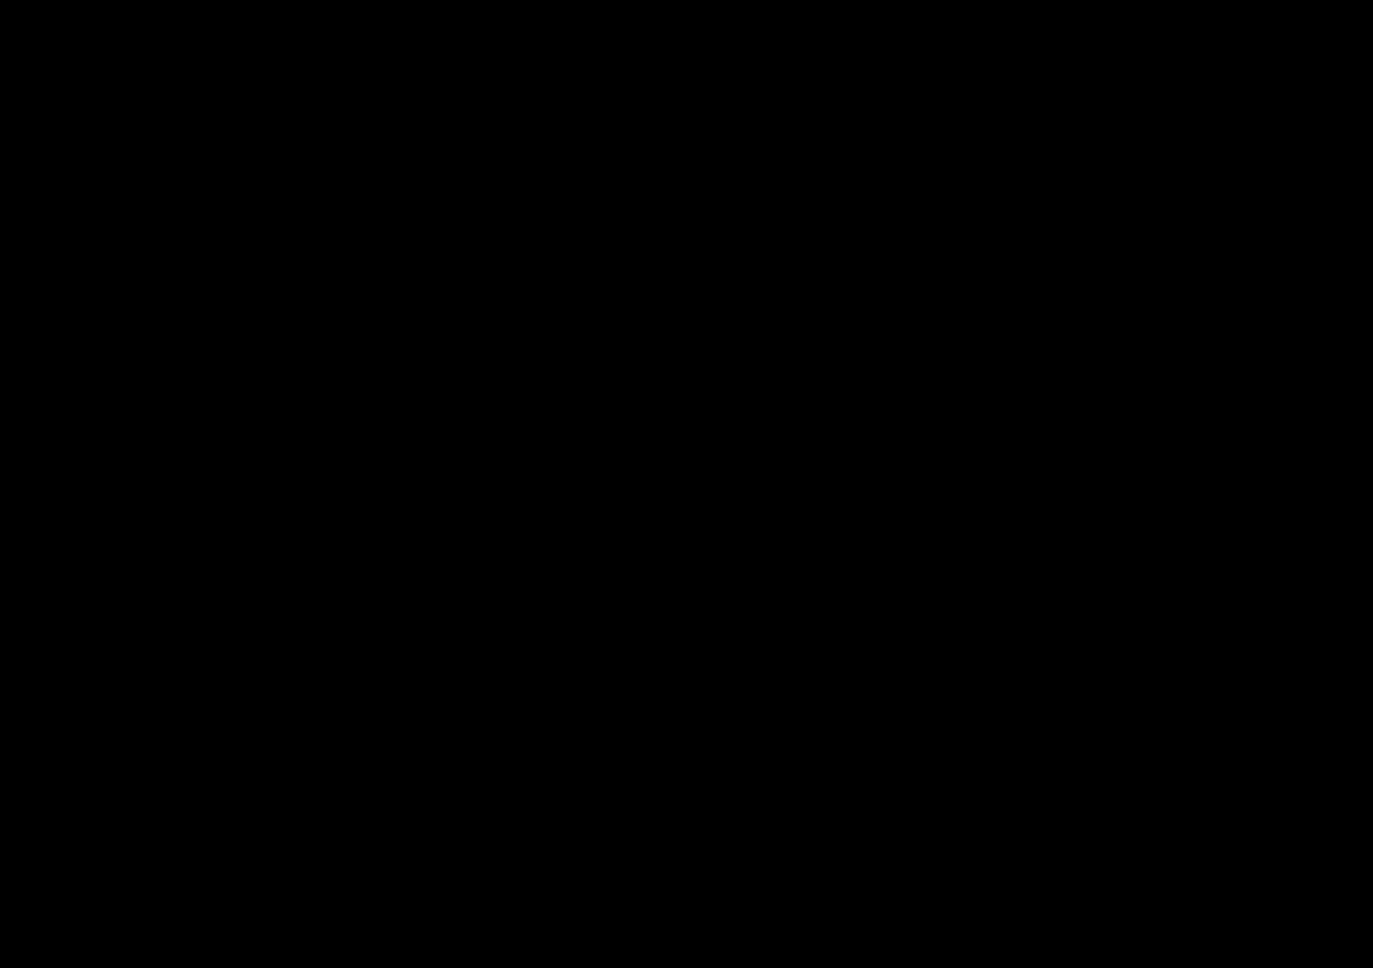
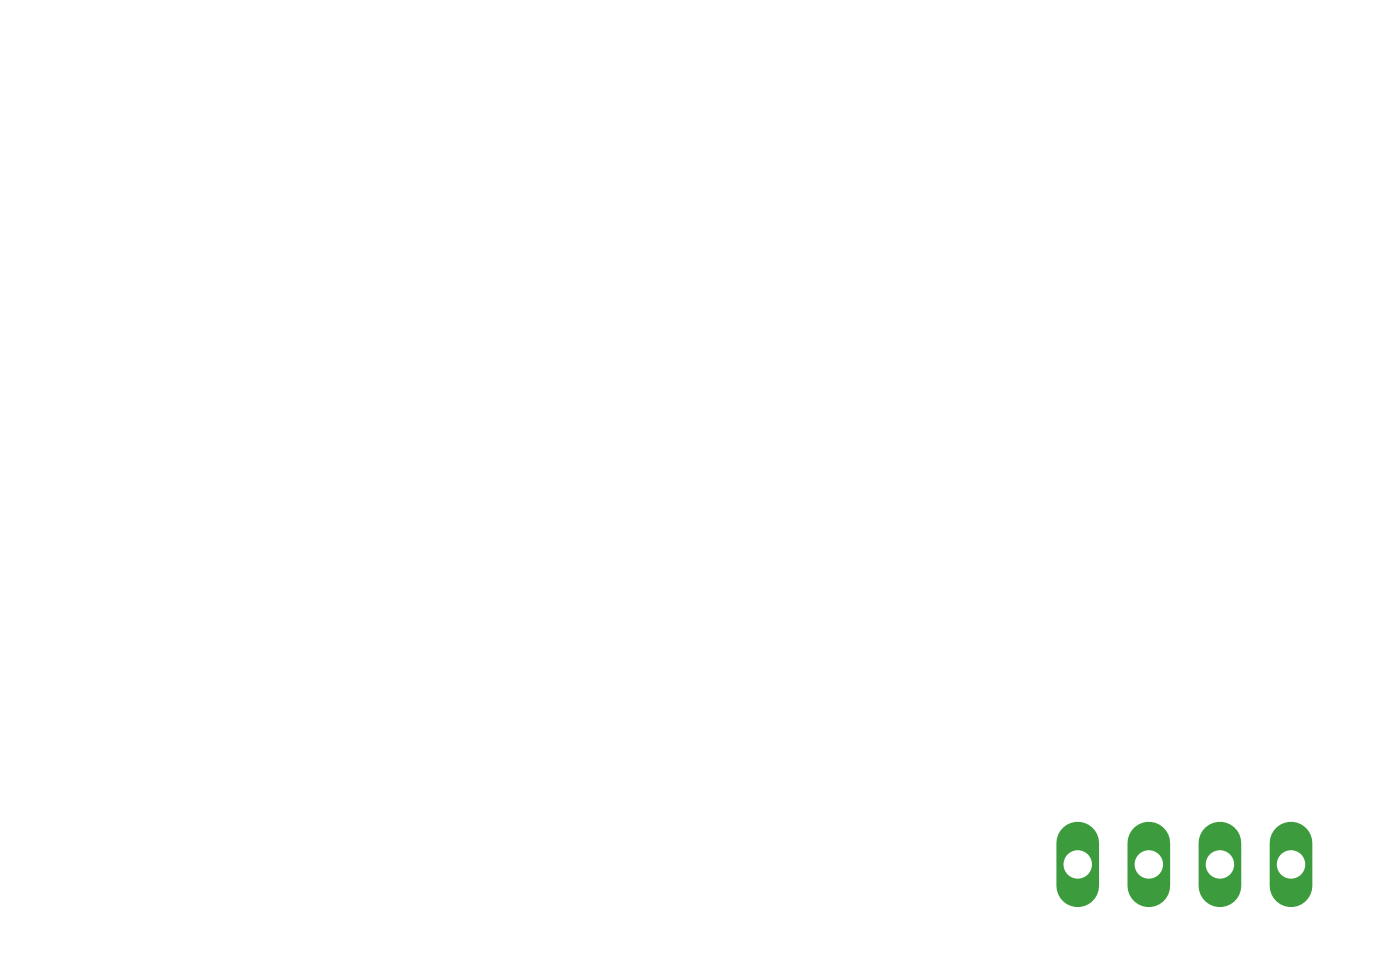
part: none -> (1184, 864)

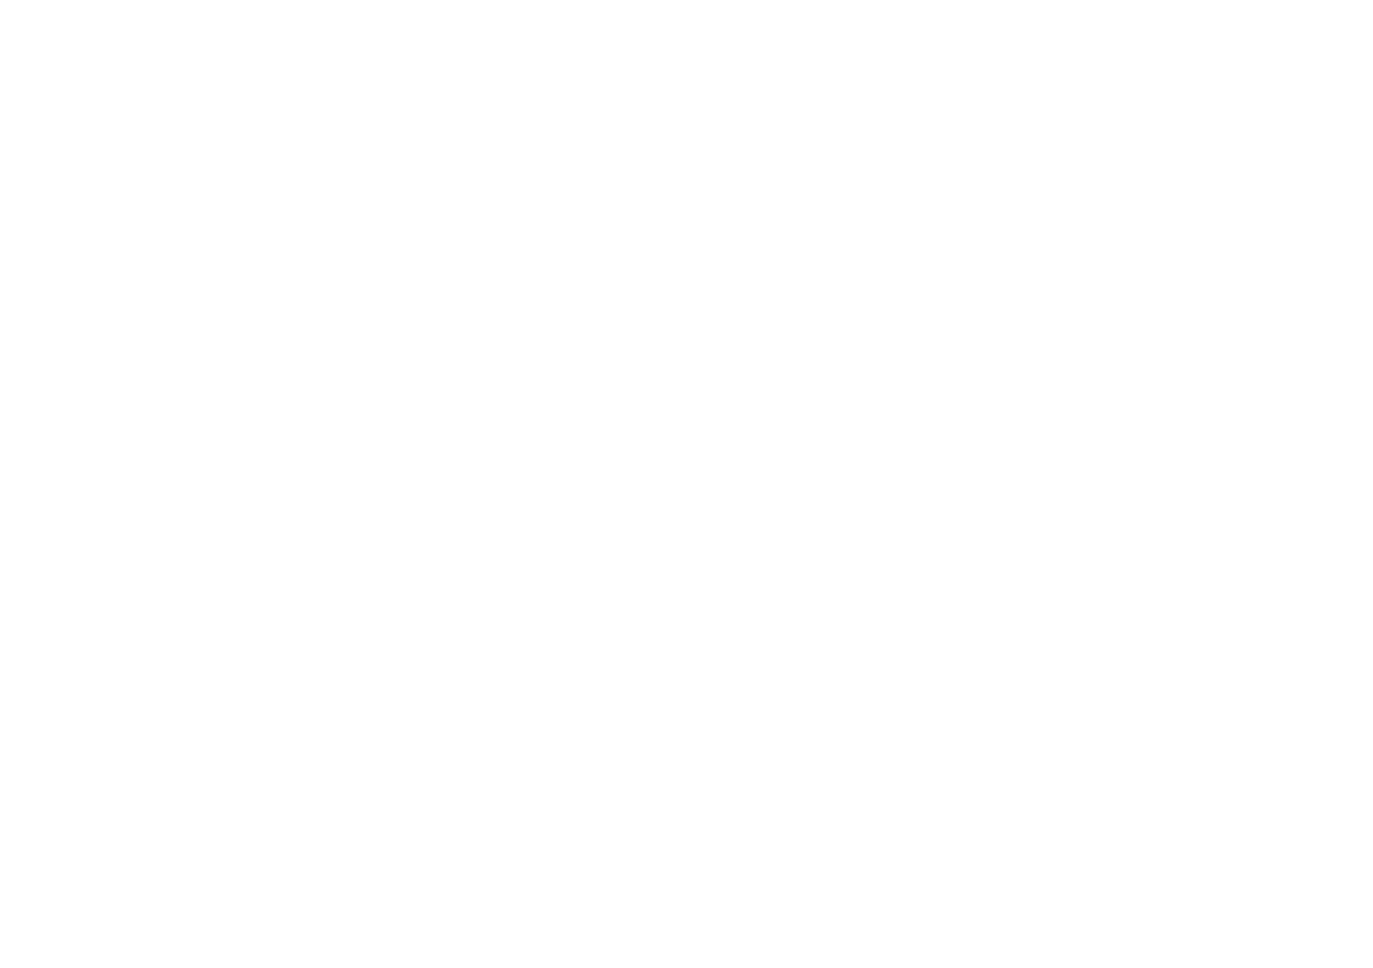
part: (1184, 864) -> none

